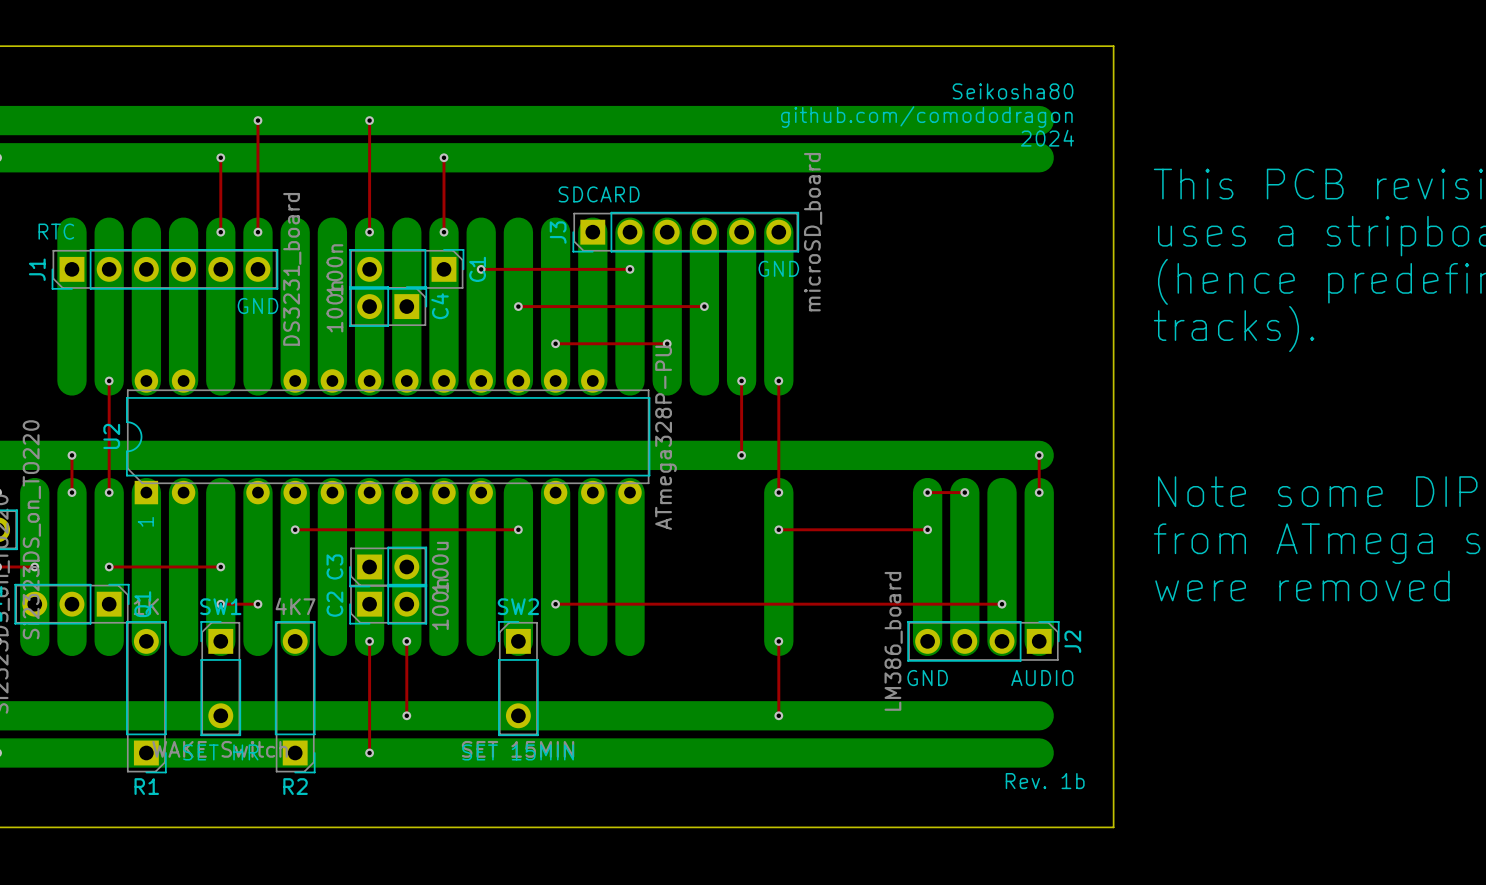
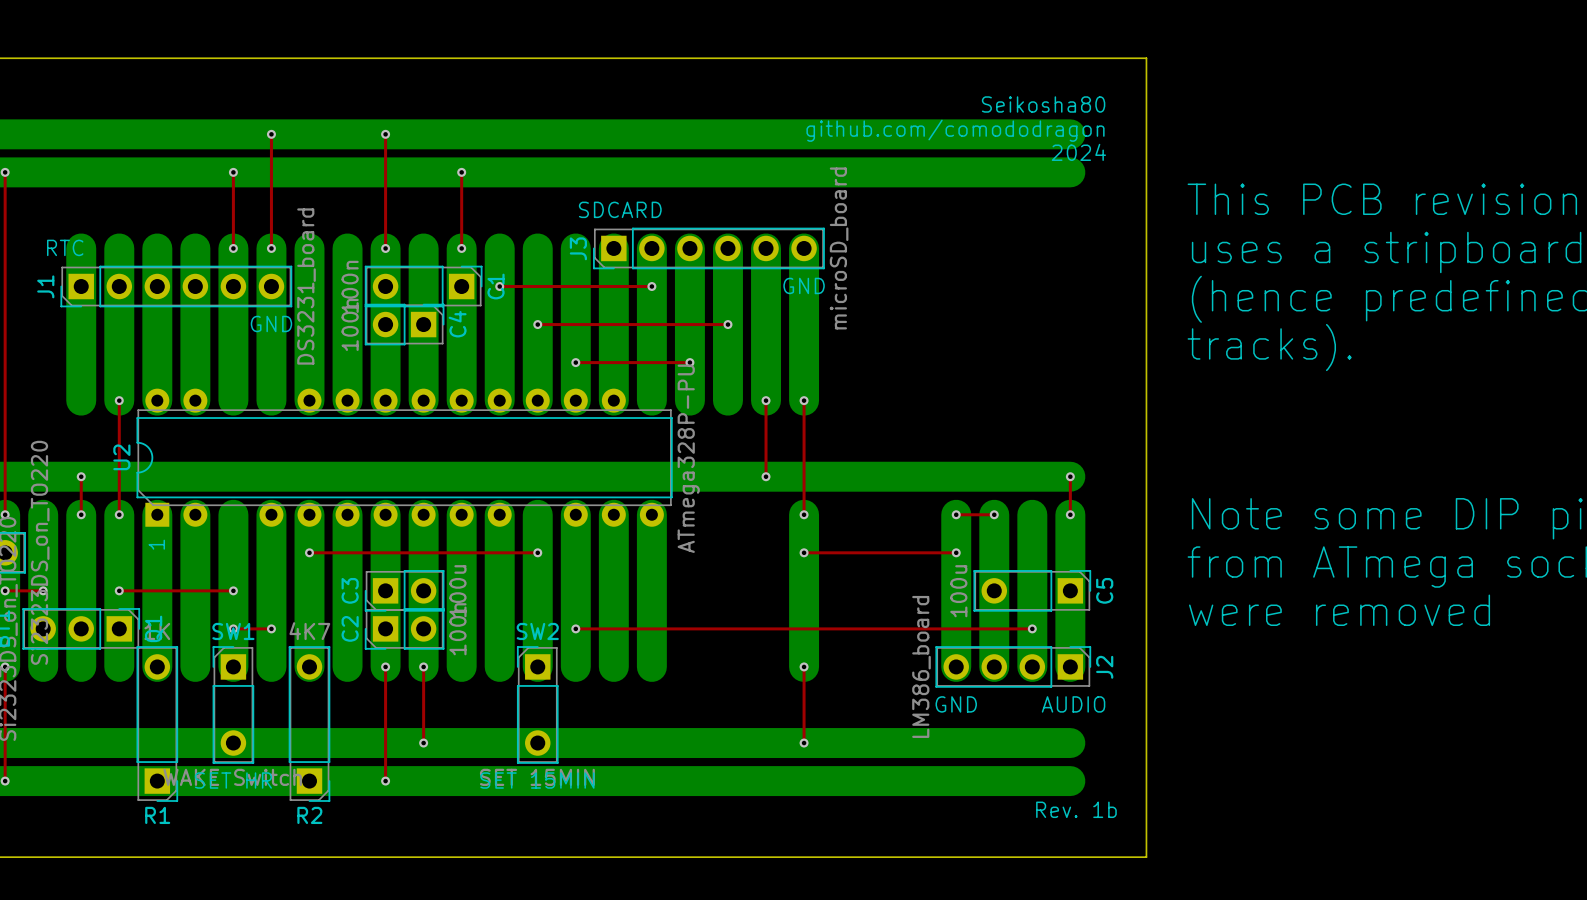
C5: none -> 100u (1032, 590)

